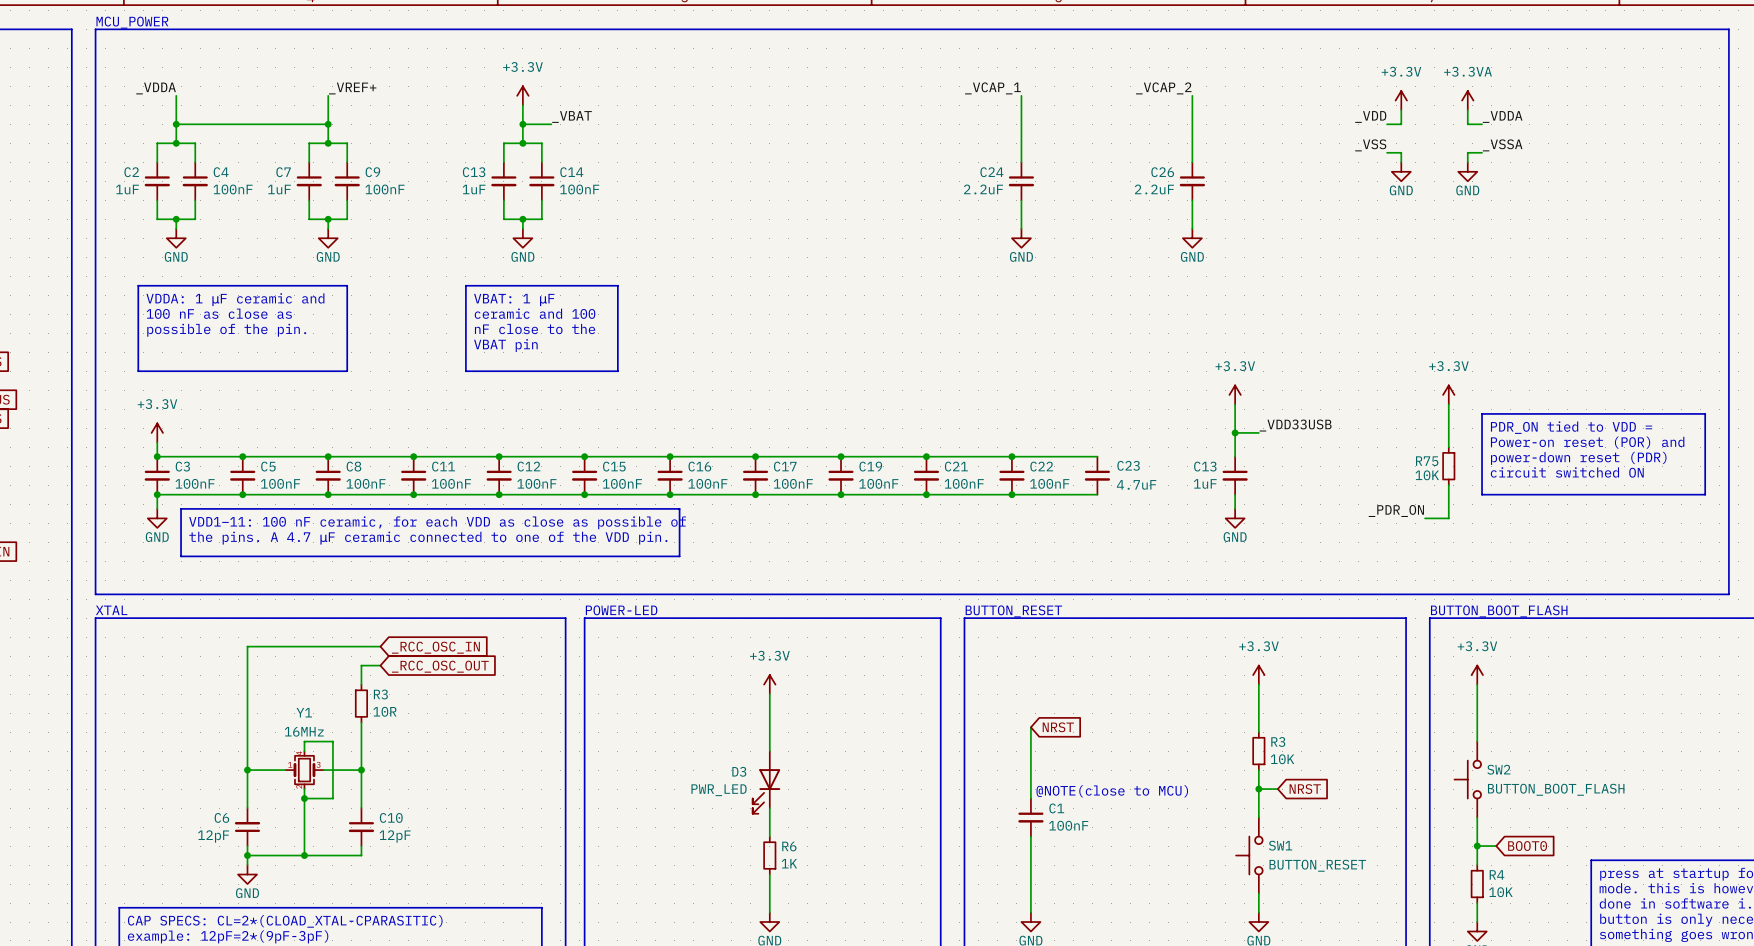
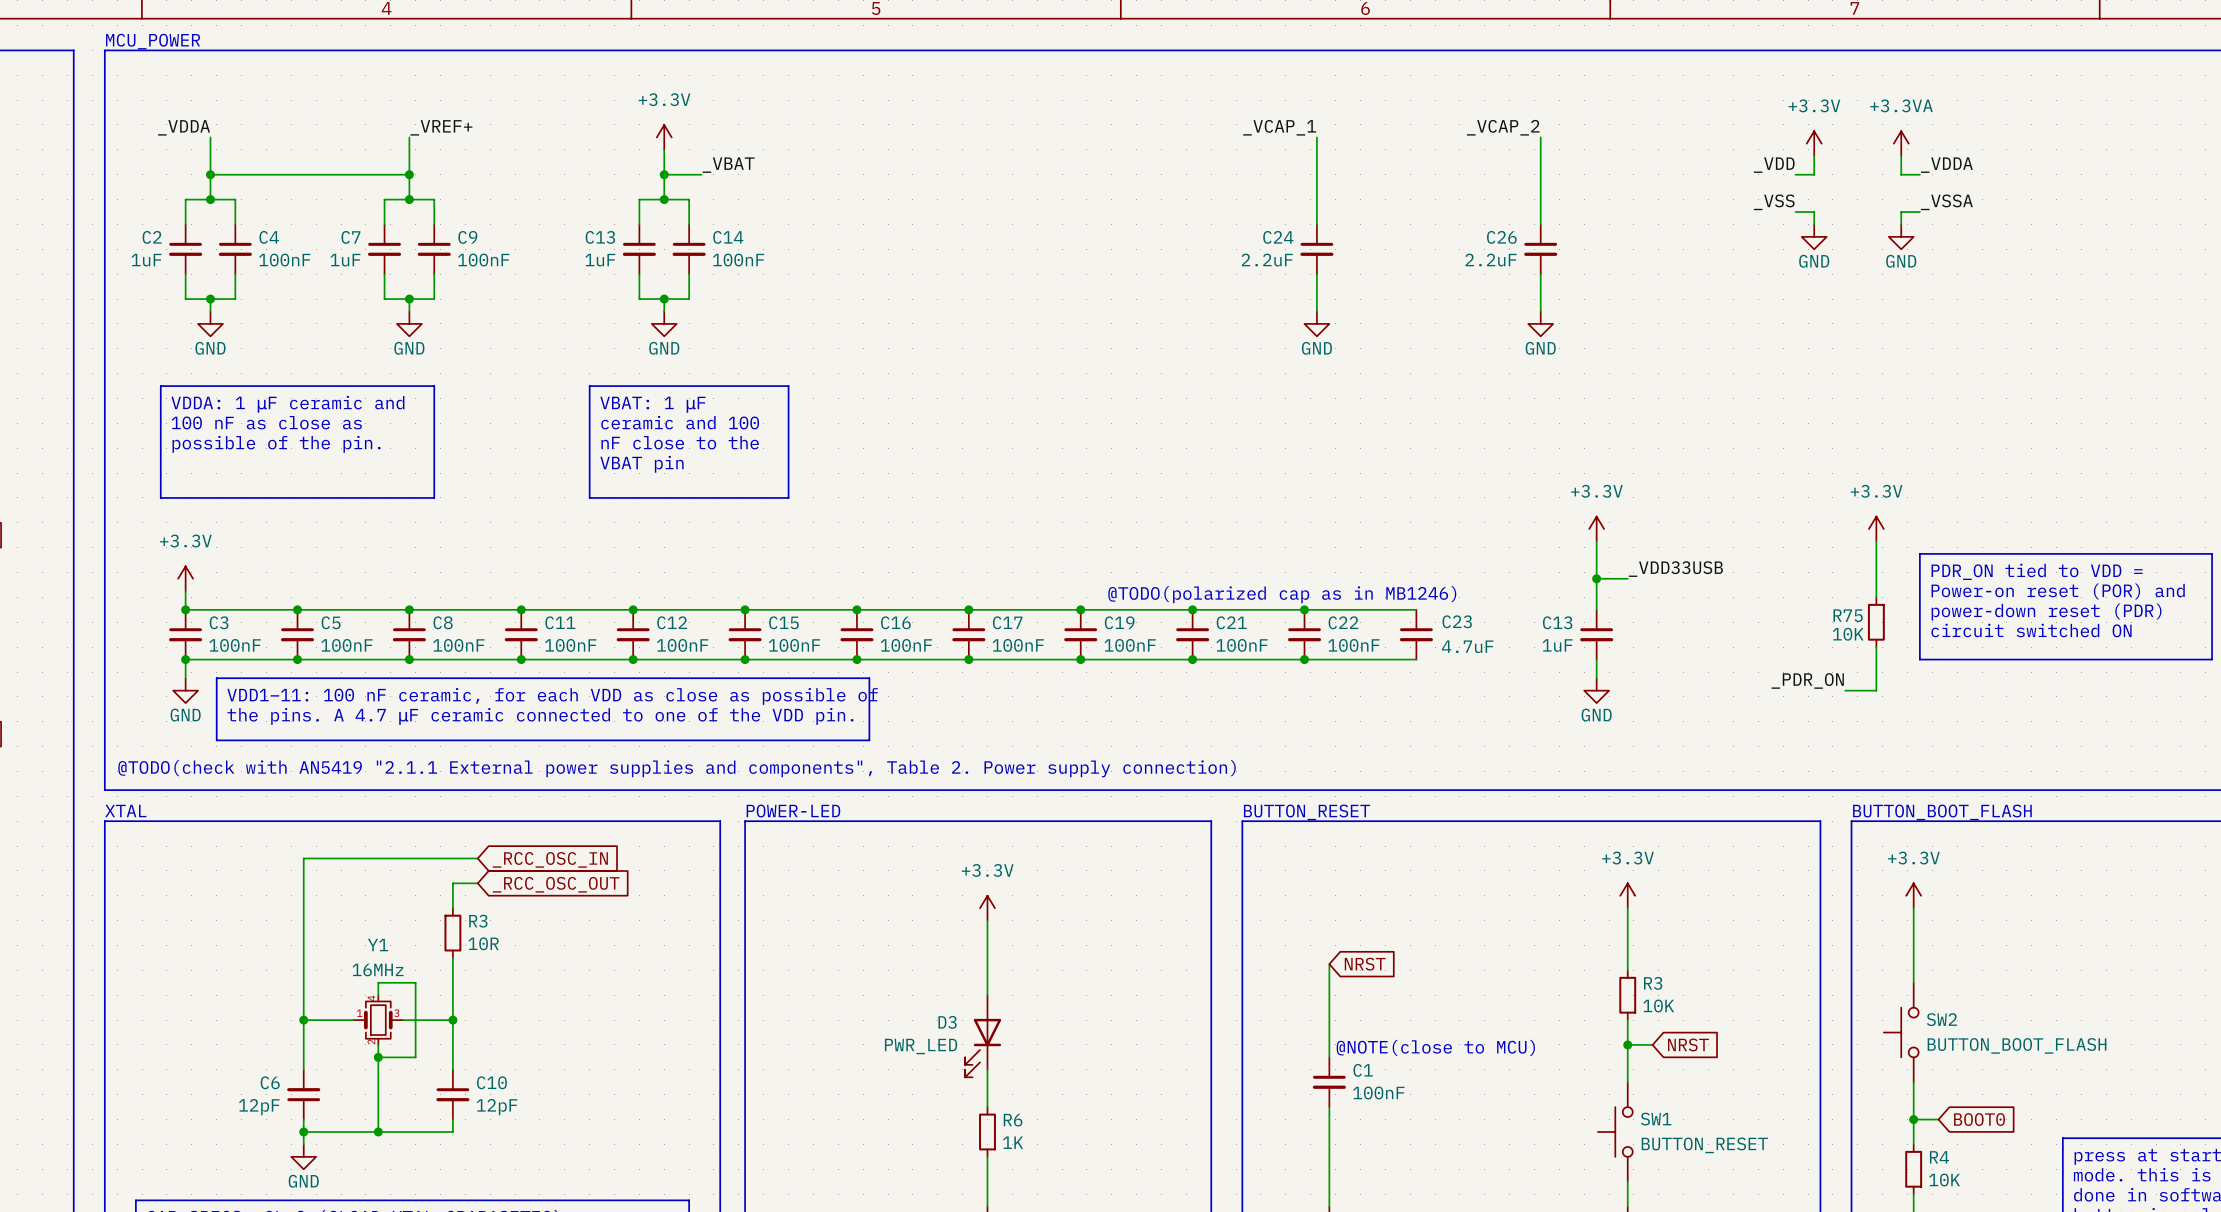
text: none -> @TODO(polarized cap as in MB1246) (1282, 594)
text: none -> @TODO(check with AN5419 "2.1.1 External power supplies and components", Table 2. Power supply connection) (677, 768)

